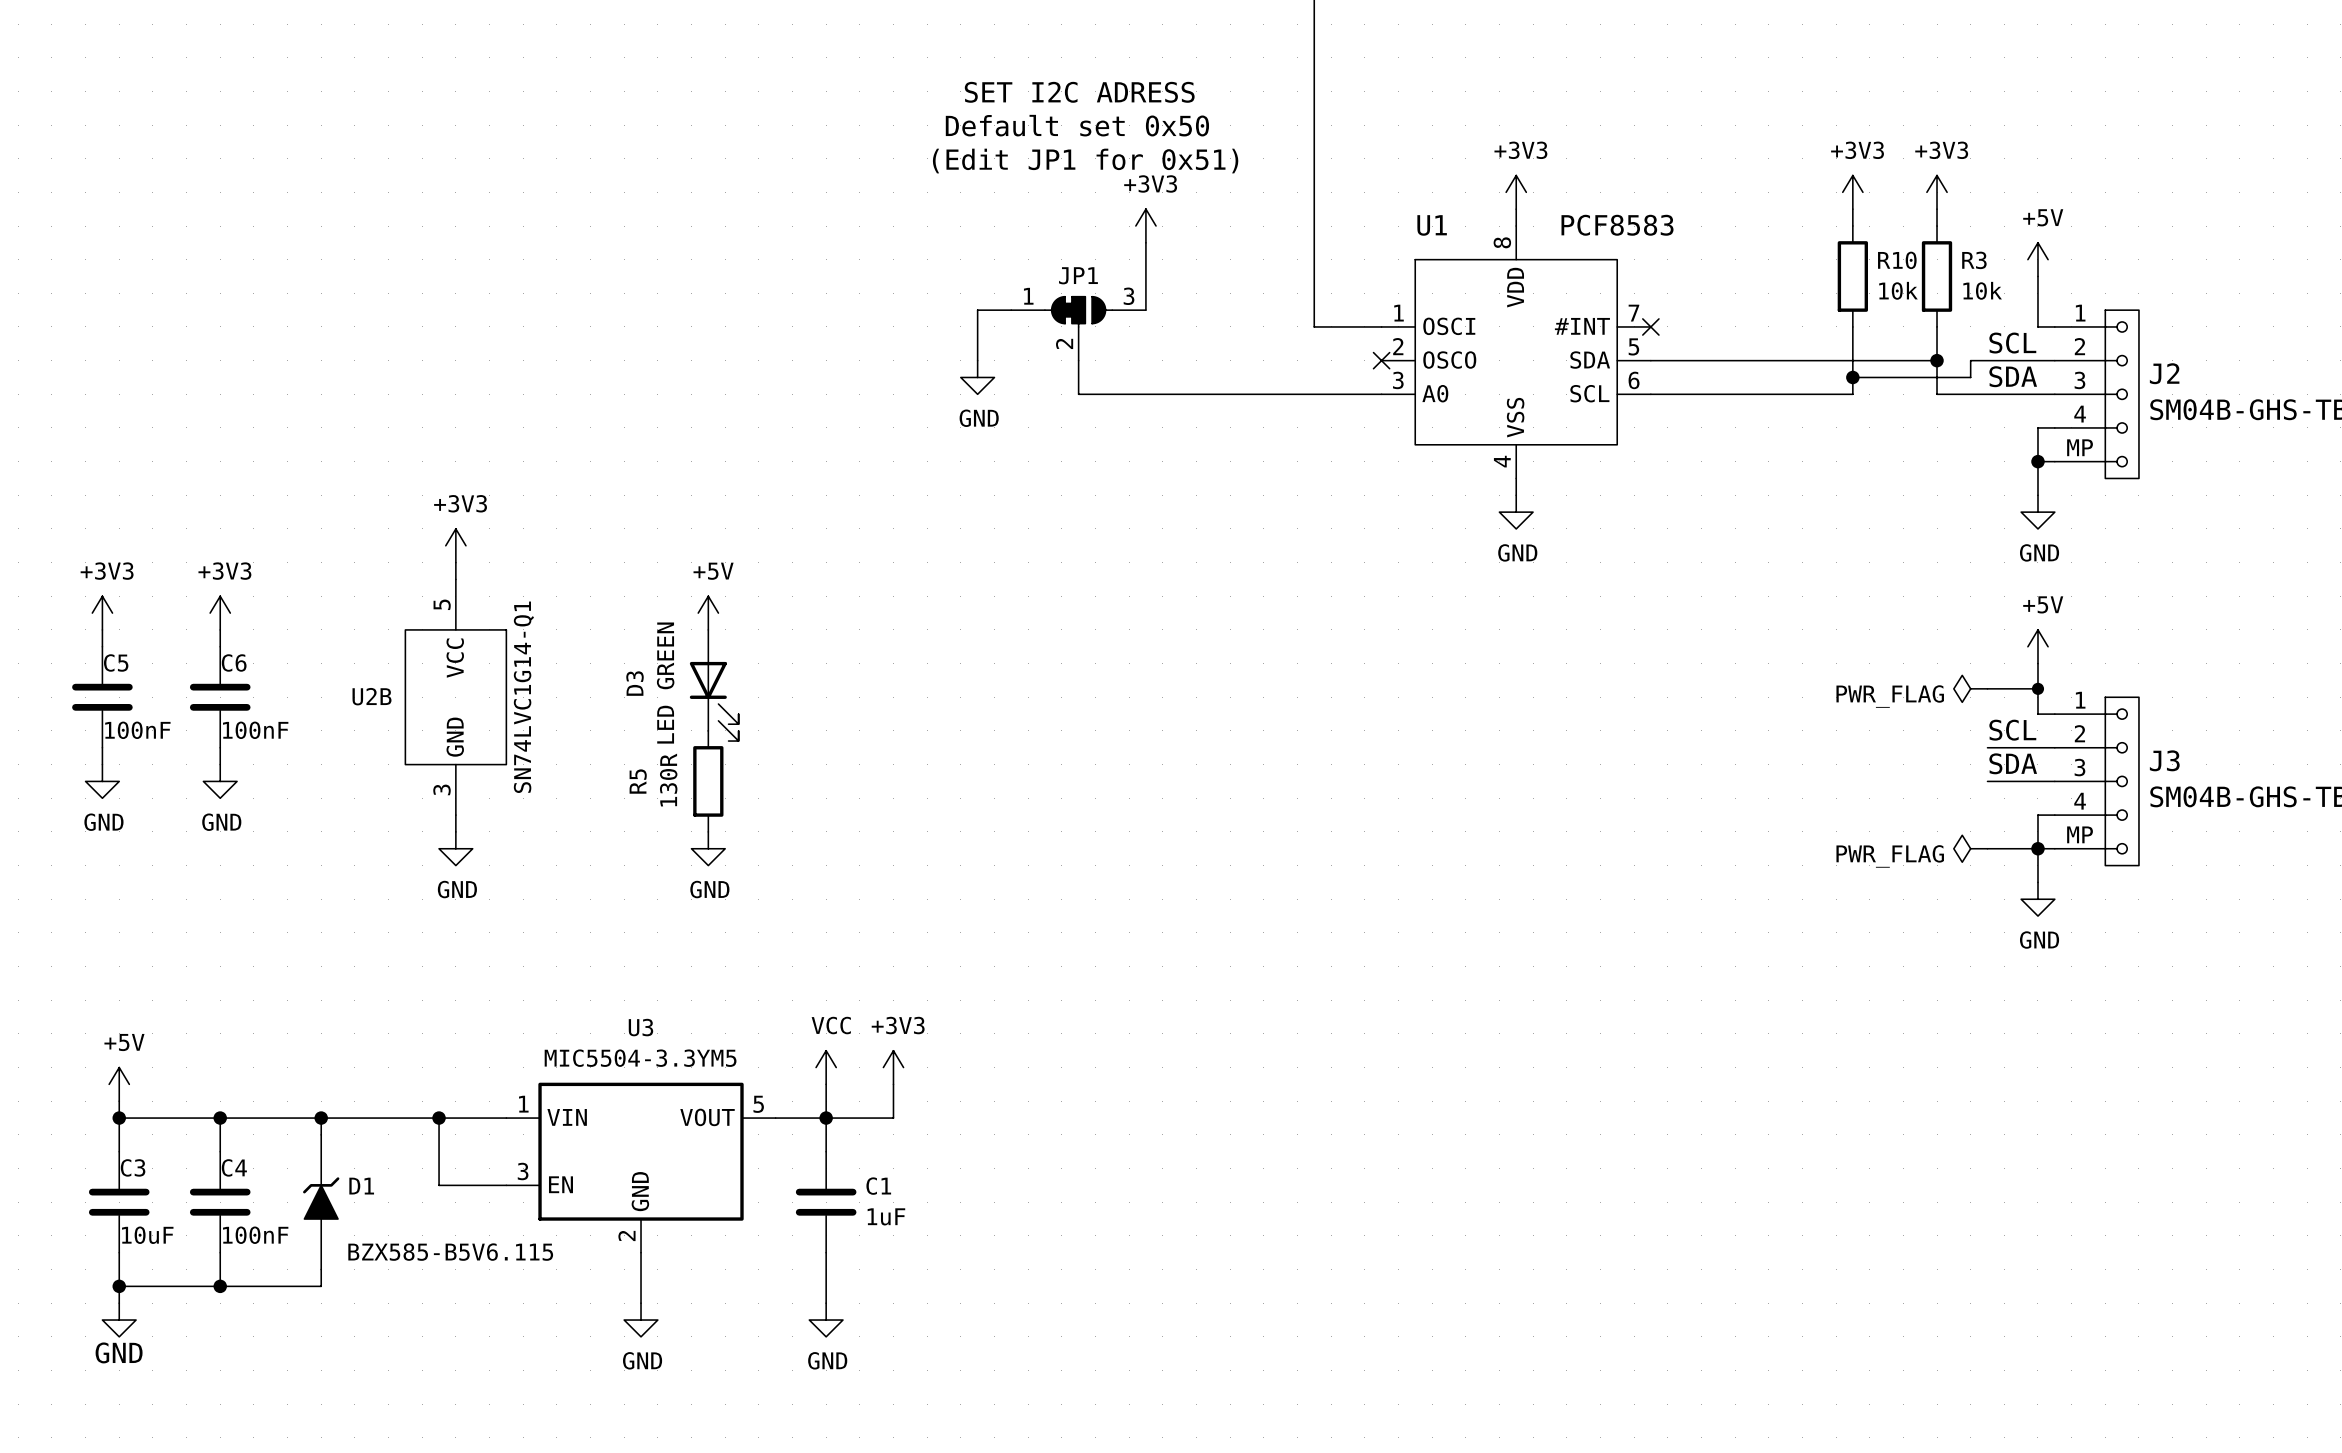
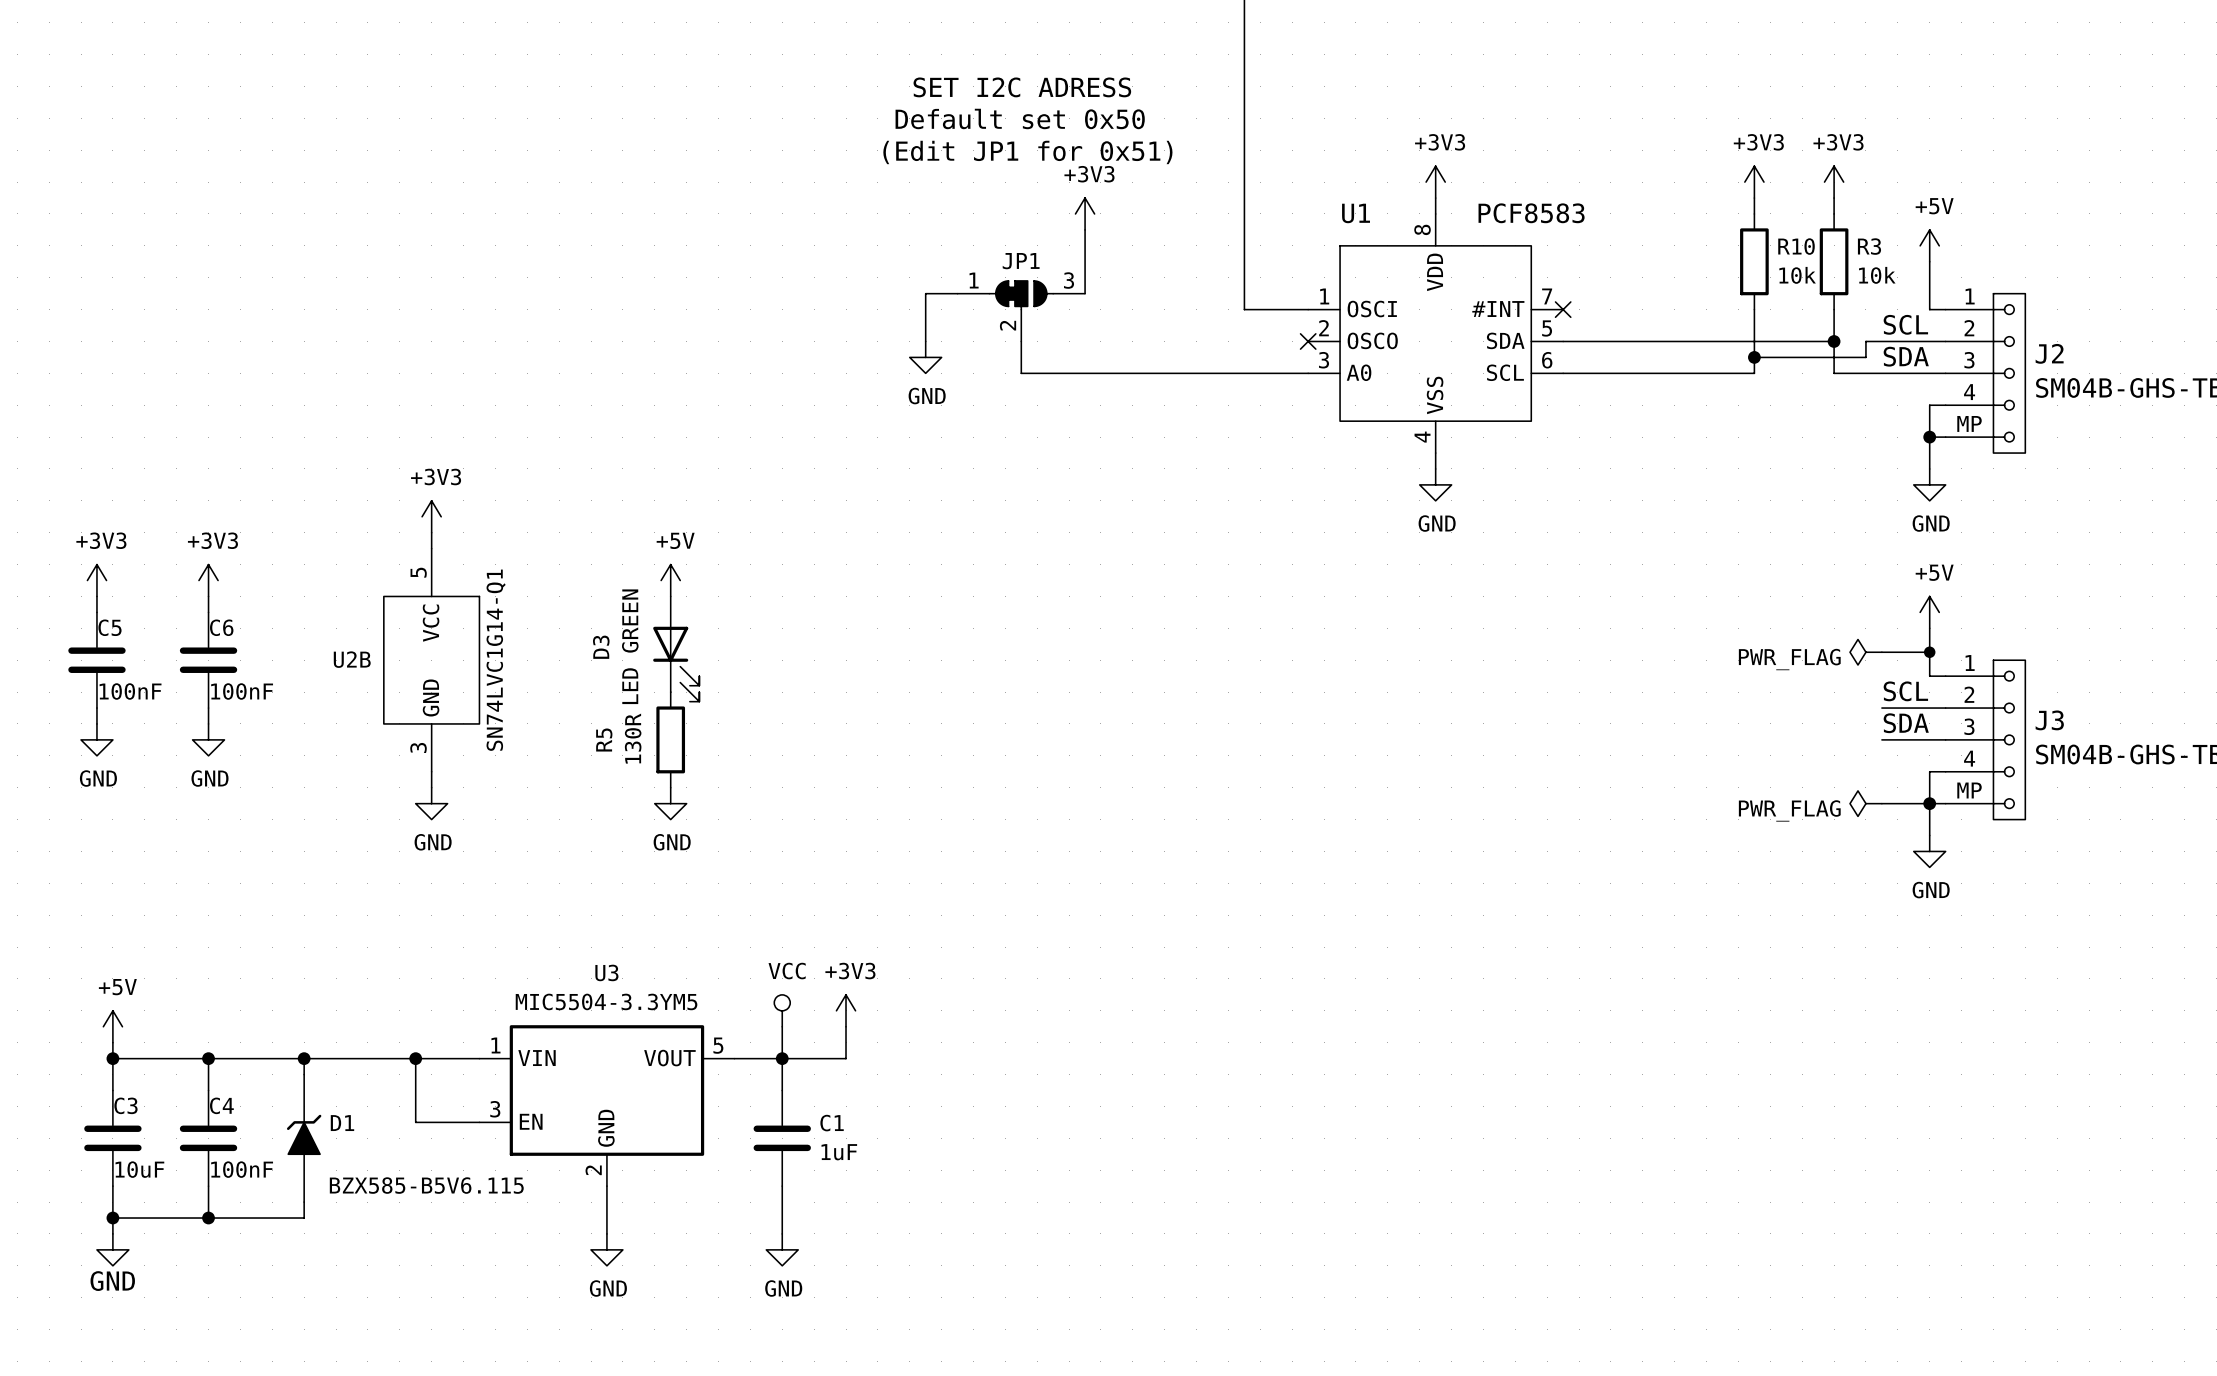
power symbol shape: [816, 1050, 837, 1085] -> [774, 994, 791, 1027]

